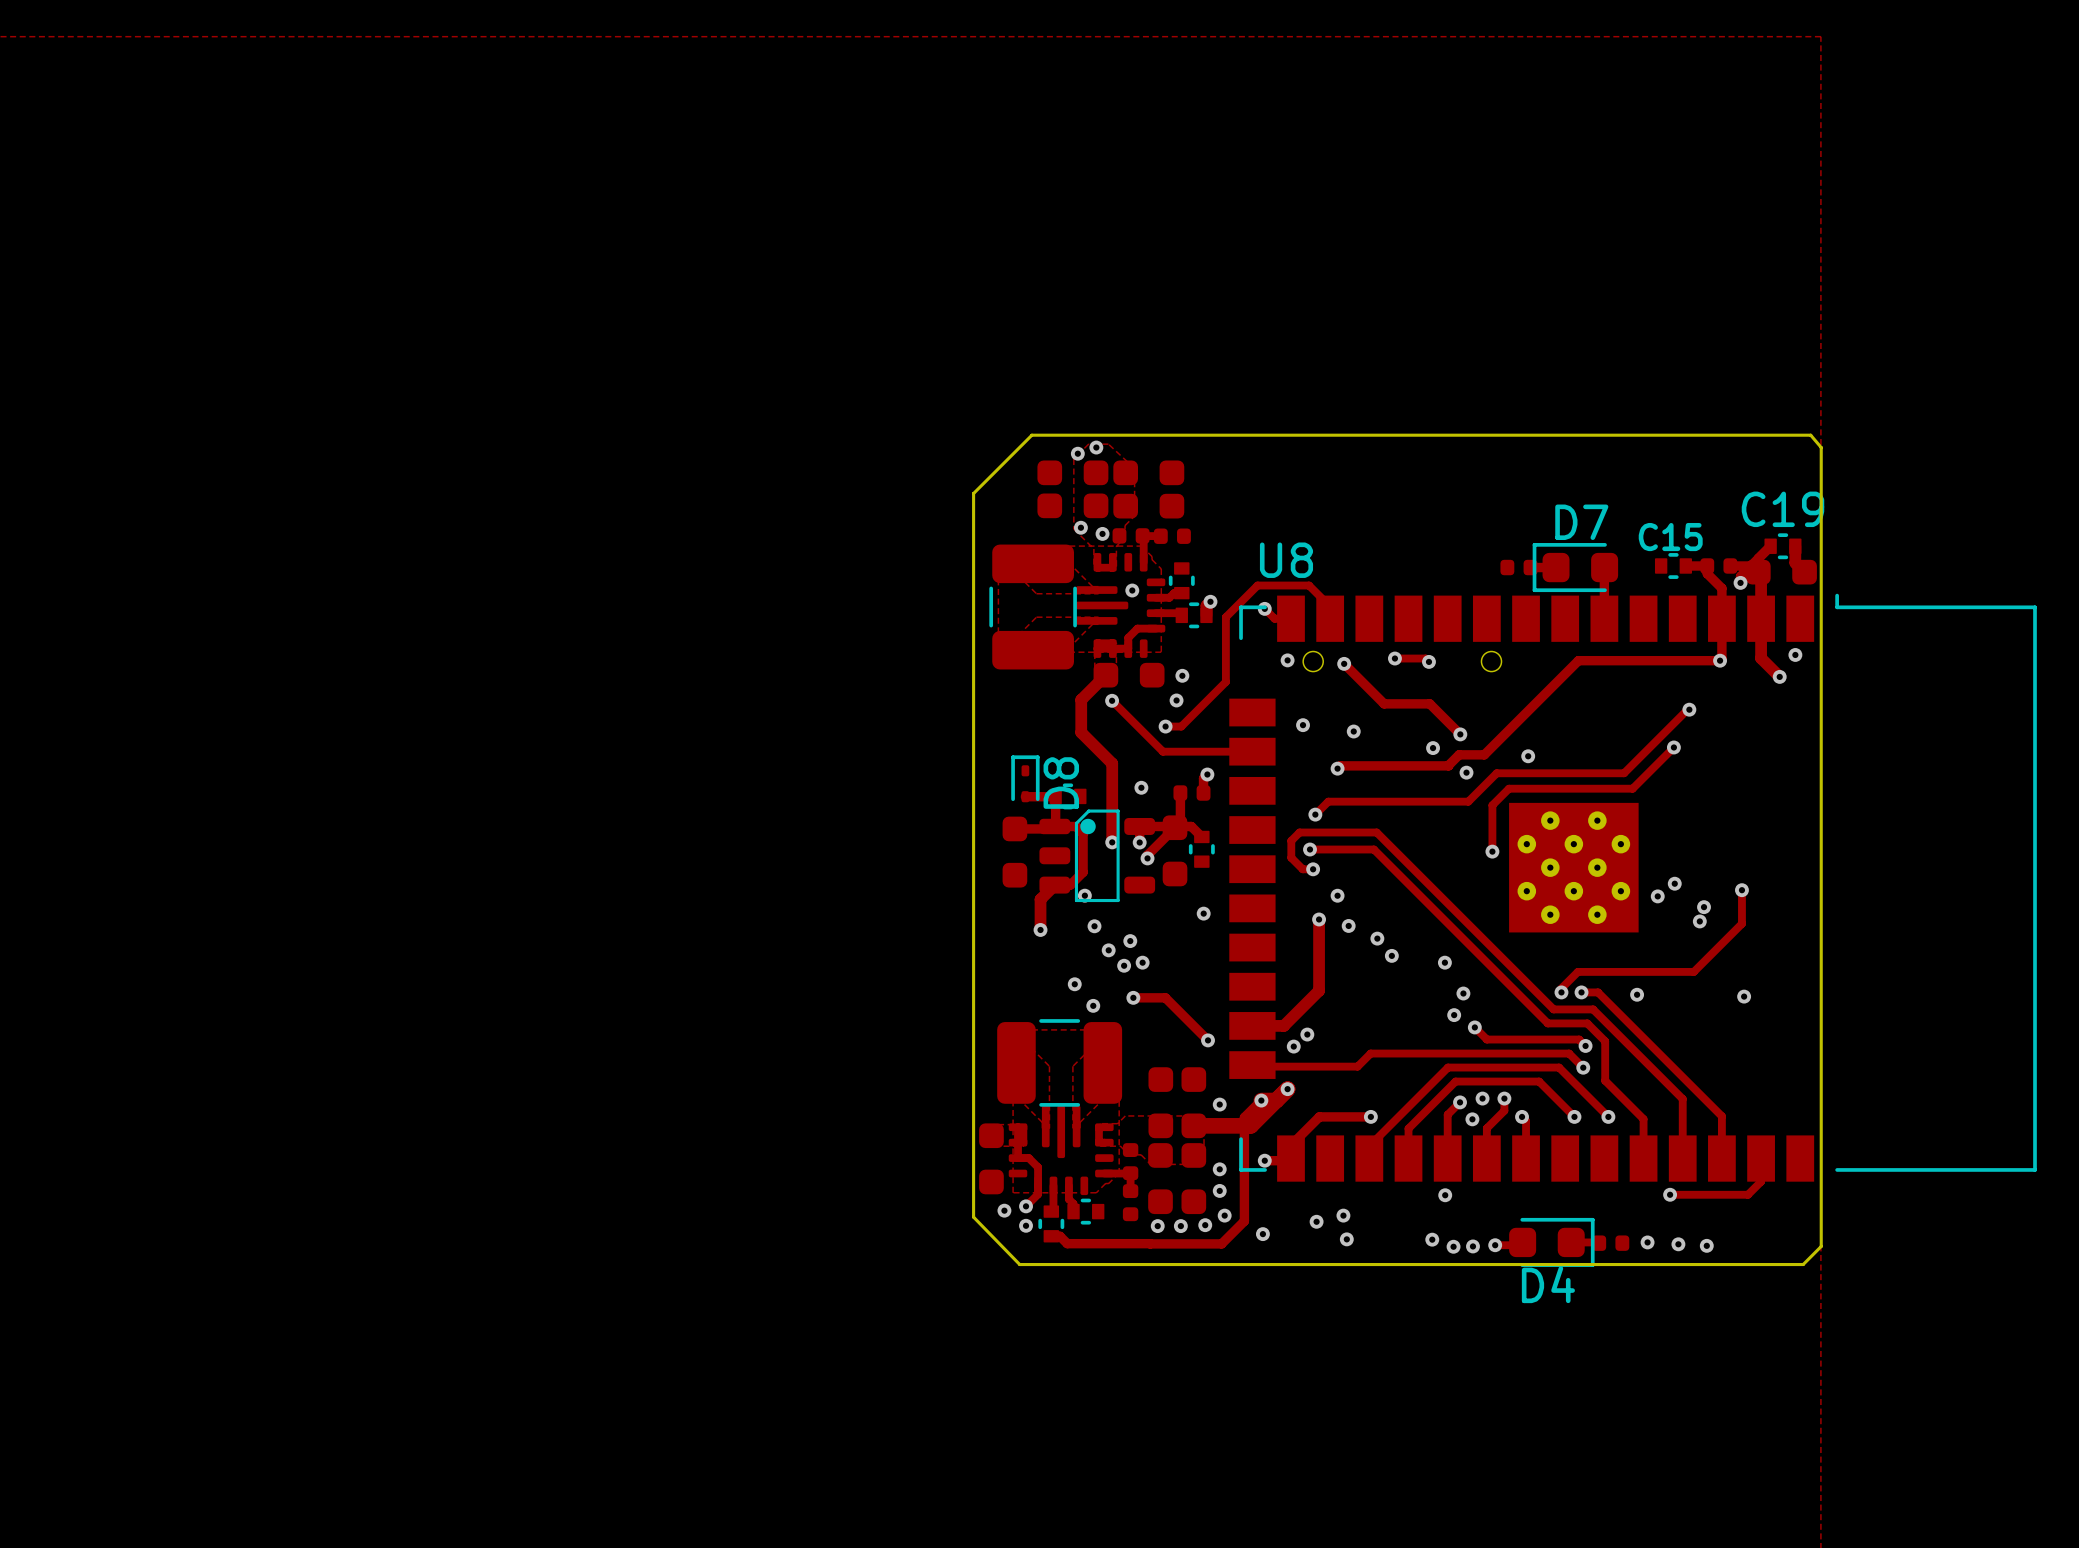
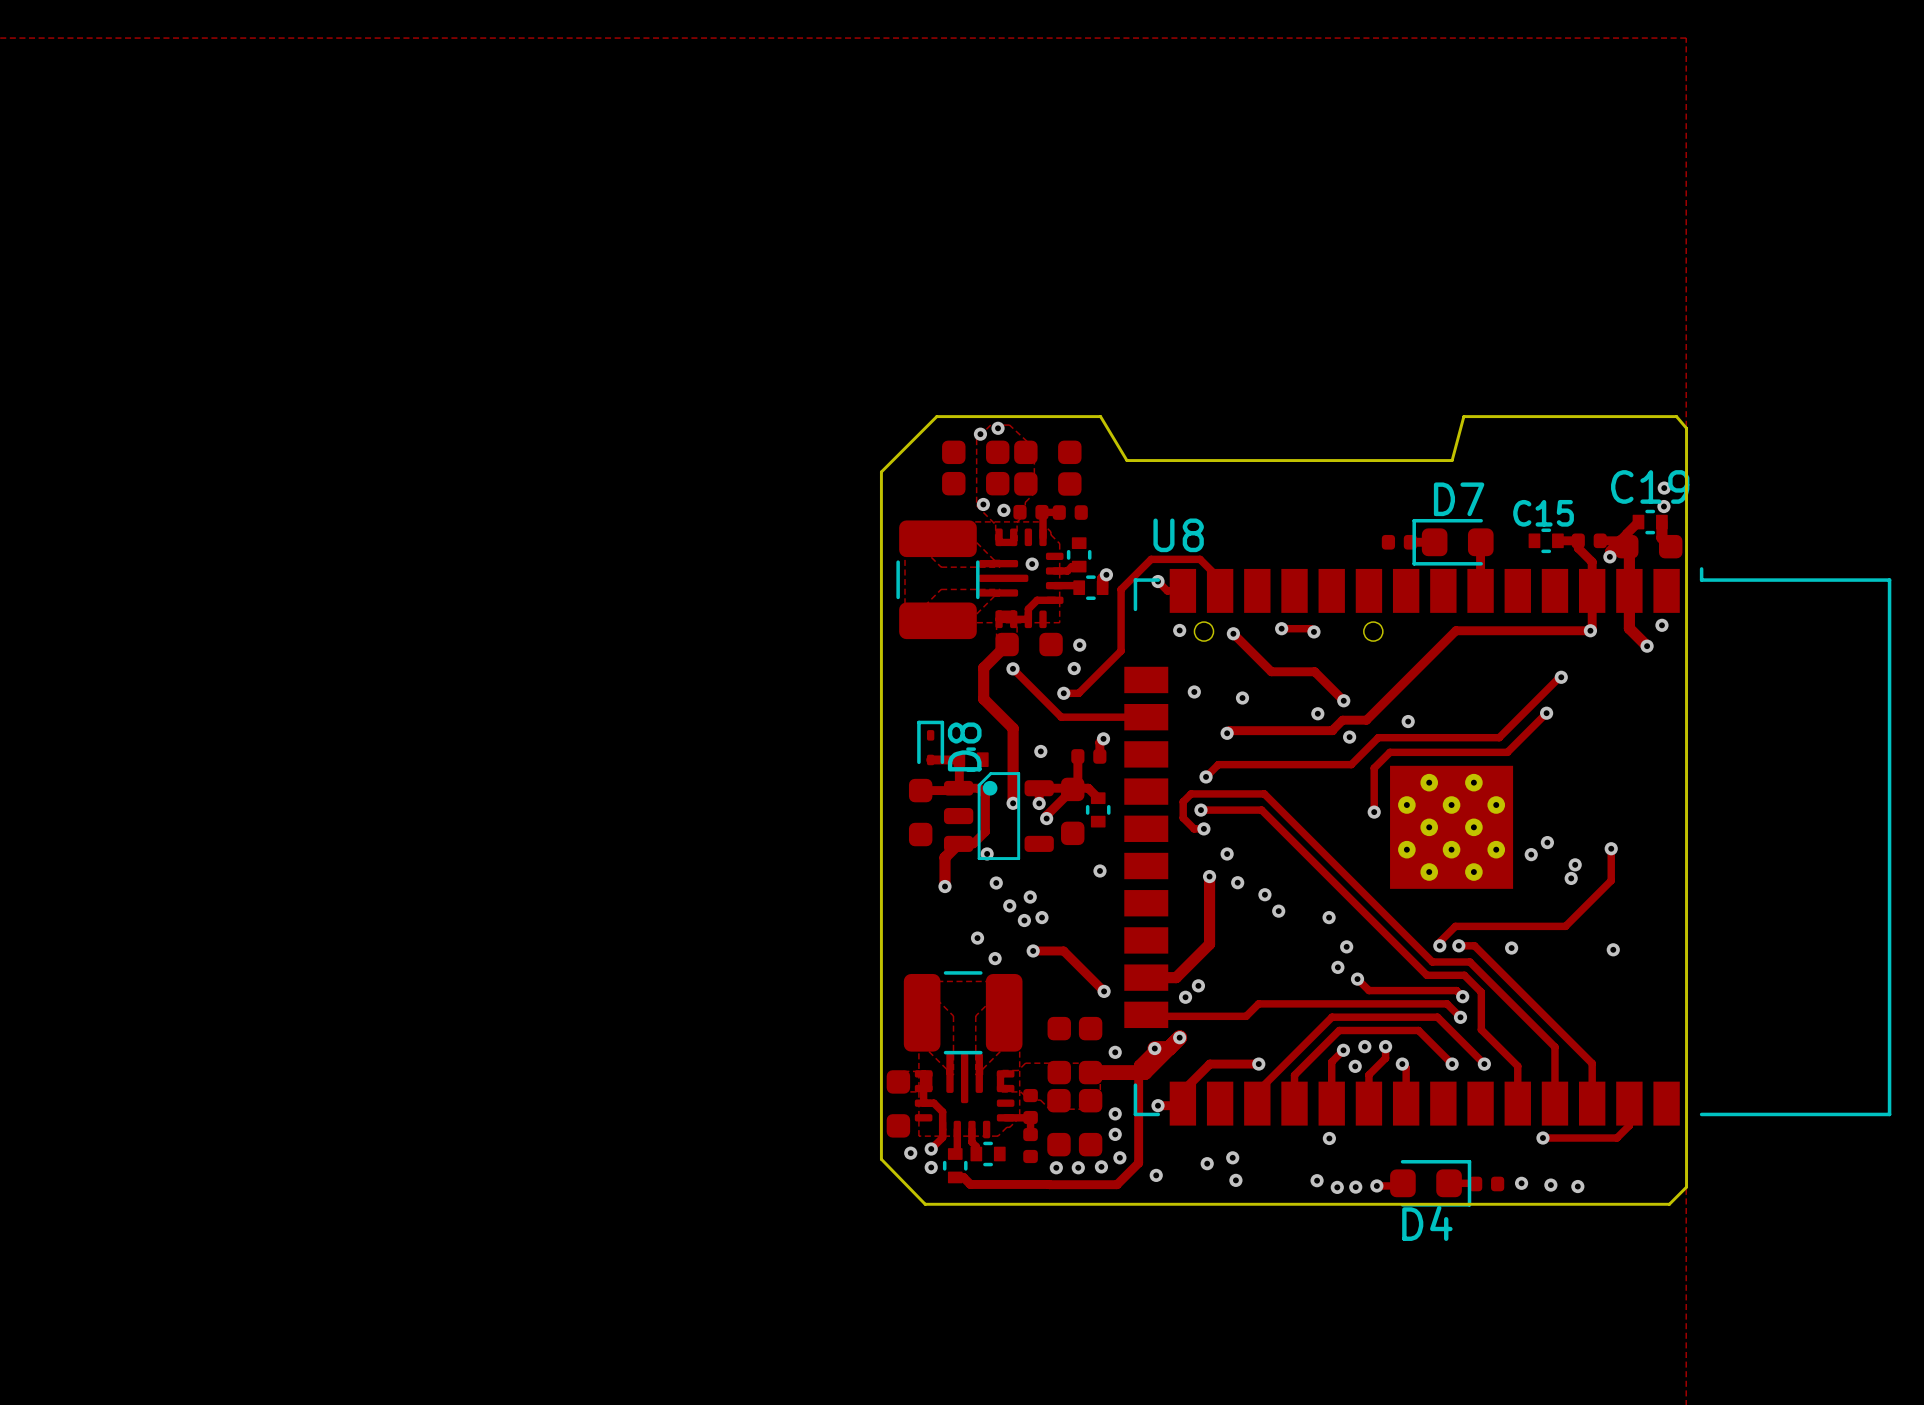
board edge: (1204, 435) (1586, 435) -> (1100, 416) (1126, 460) (1452, 460) (1463, 416)
via: none -> (1664, 488)
via: none -> (1663, 506)

